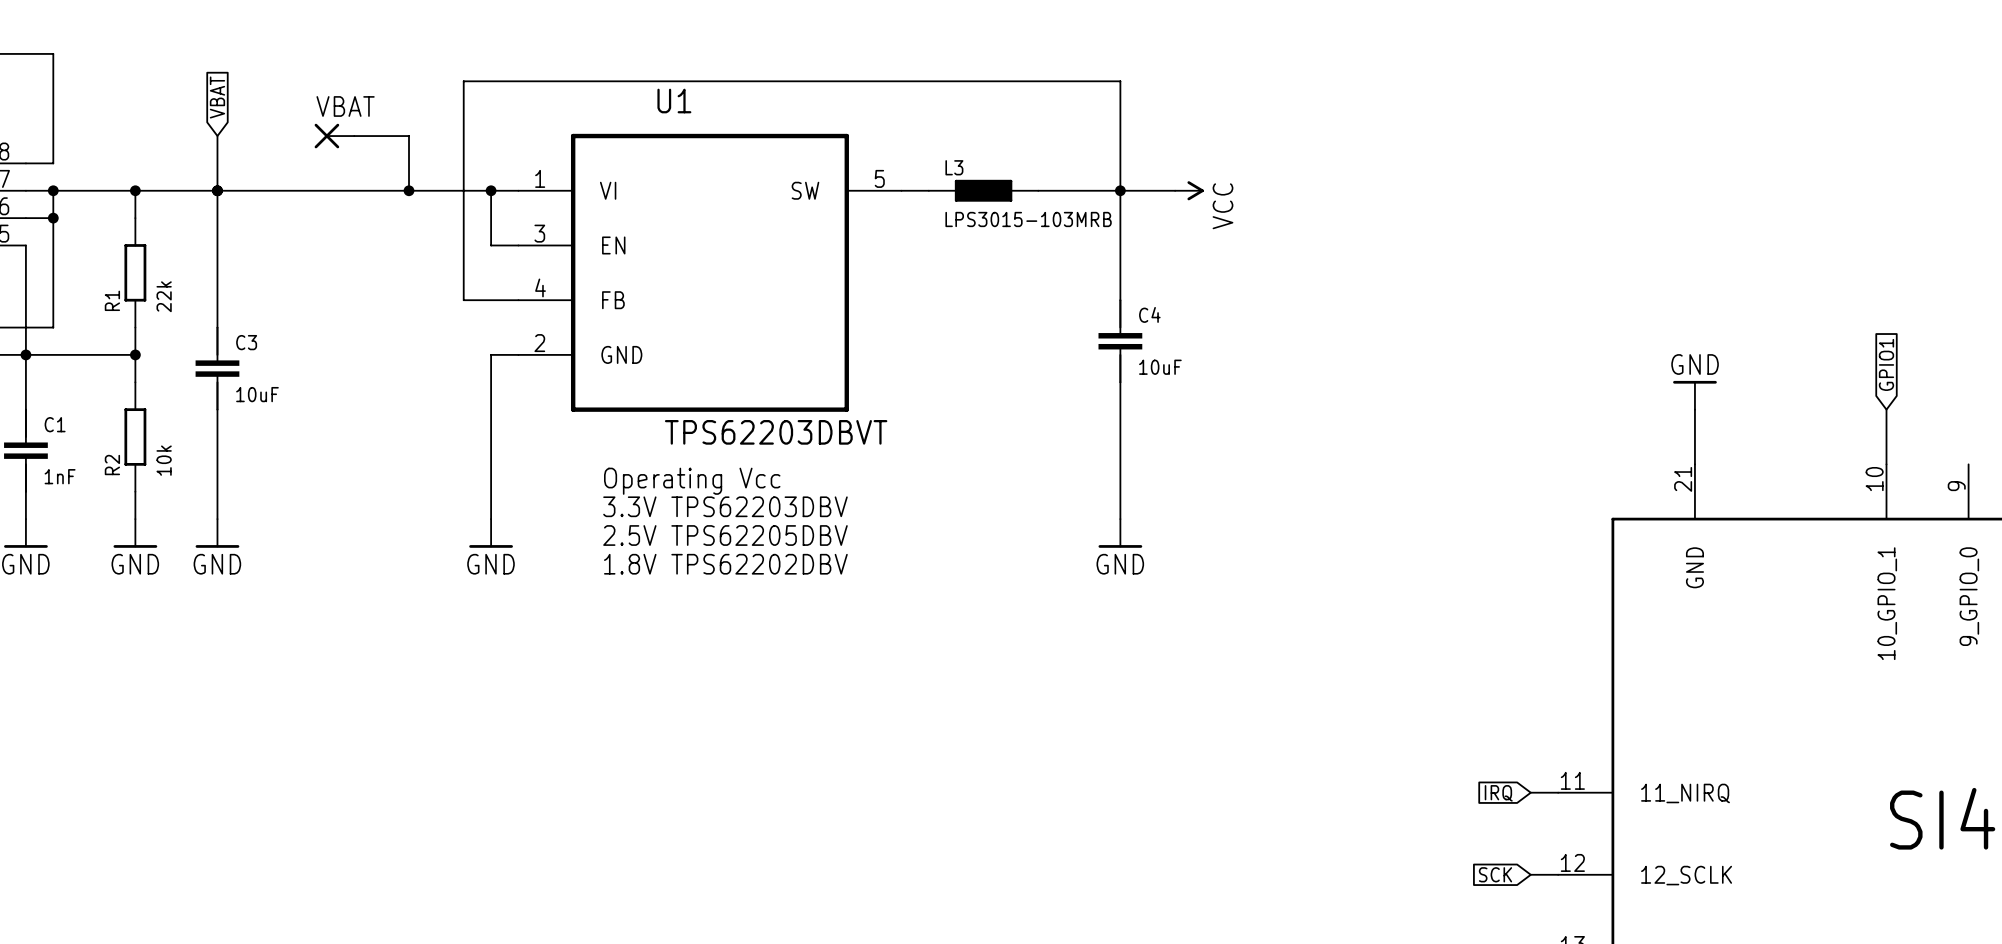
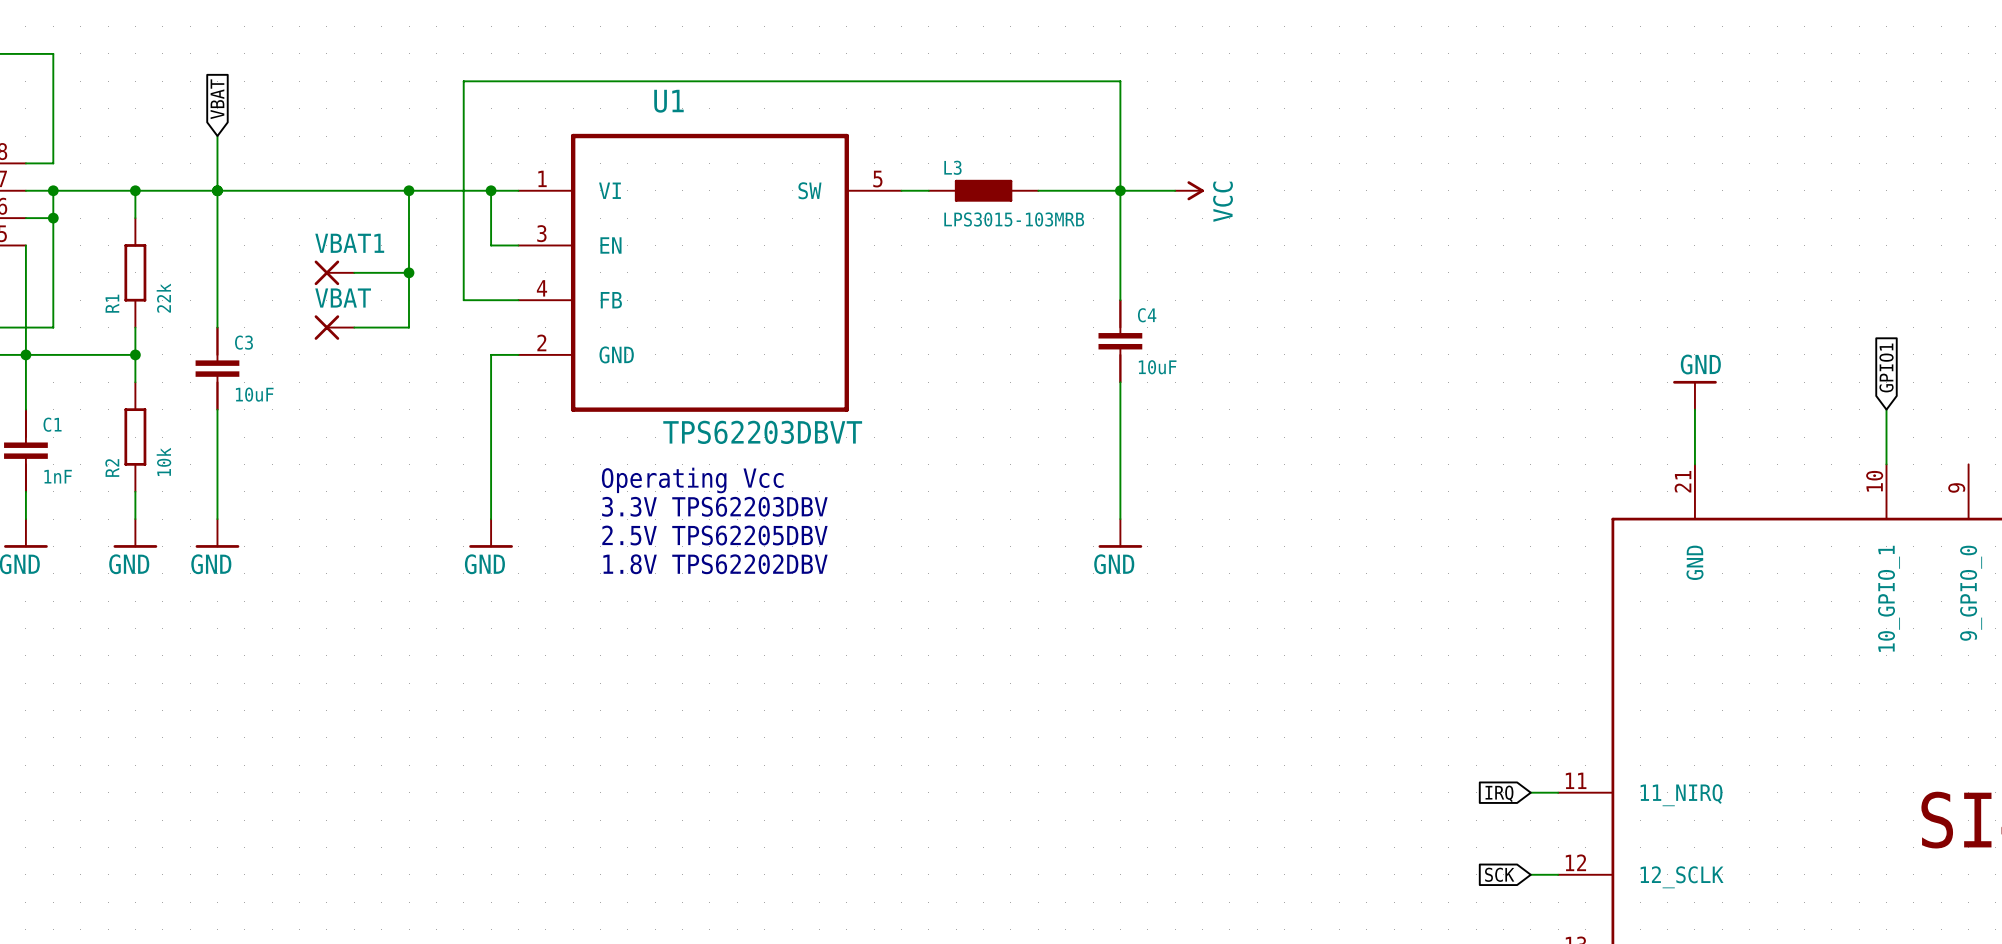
VBAT position: (334, 136) -> (334, 327)
wire: (354, 136) (409, 136) (409, 190) -> (354, 327) (409, 327) (409, 190)
VBAT1: none -> (334, 272)
wire: none -> (354, 272) (409, 272)
junction: none -> (409, 272)

